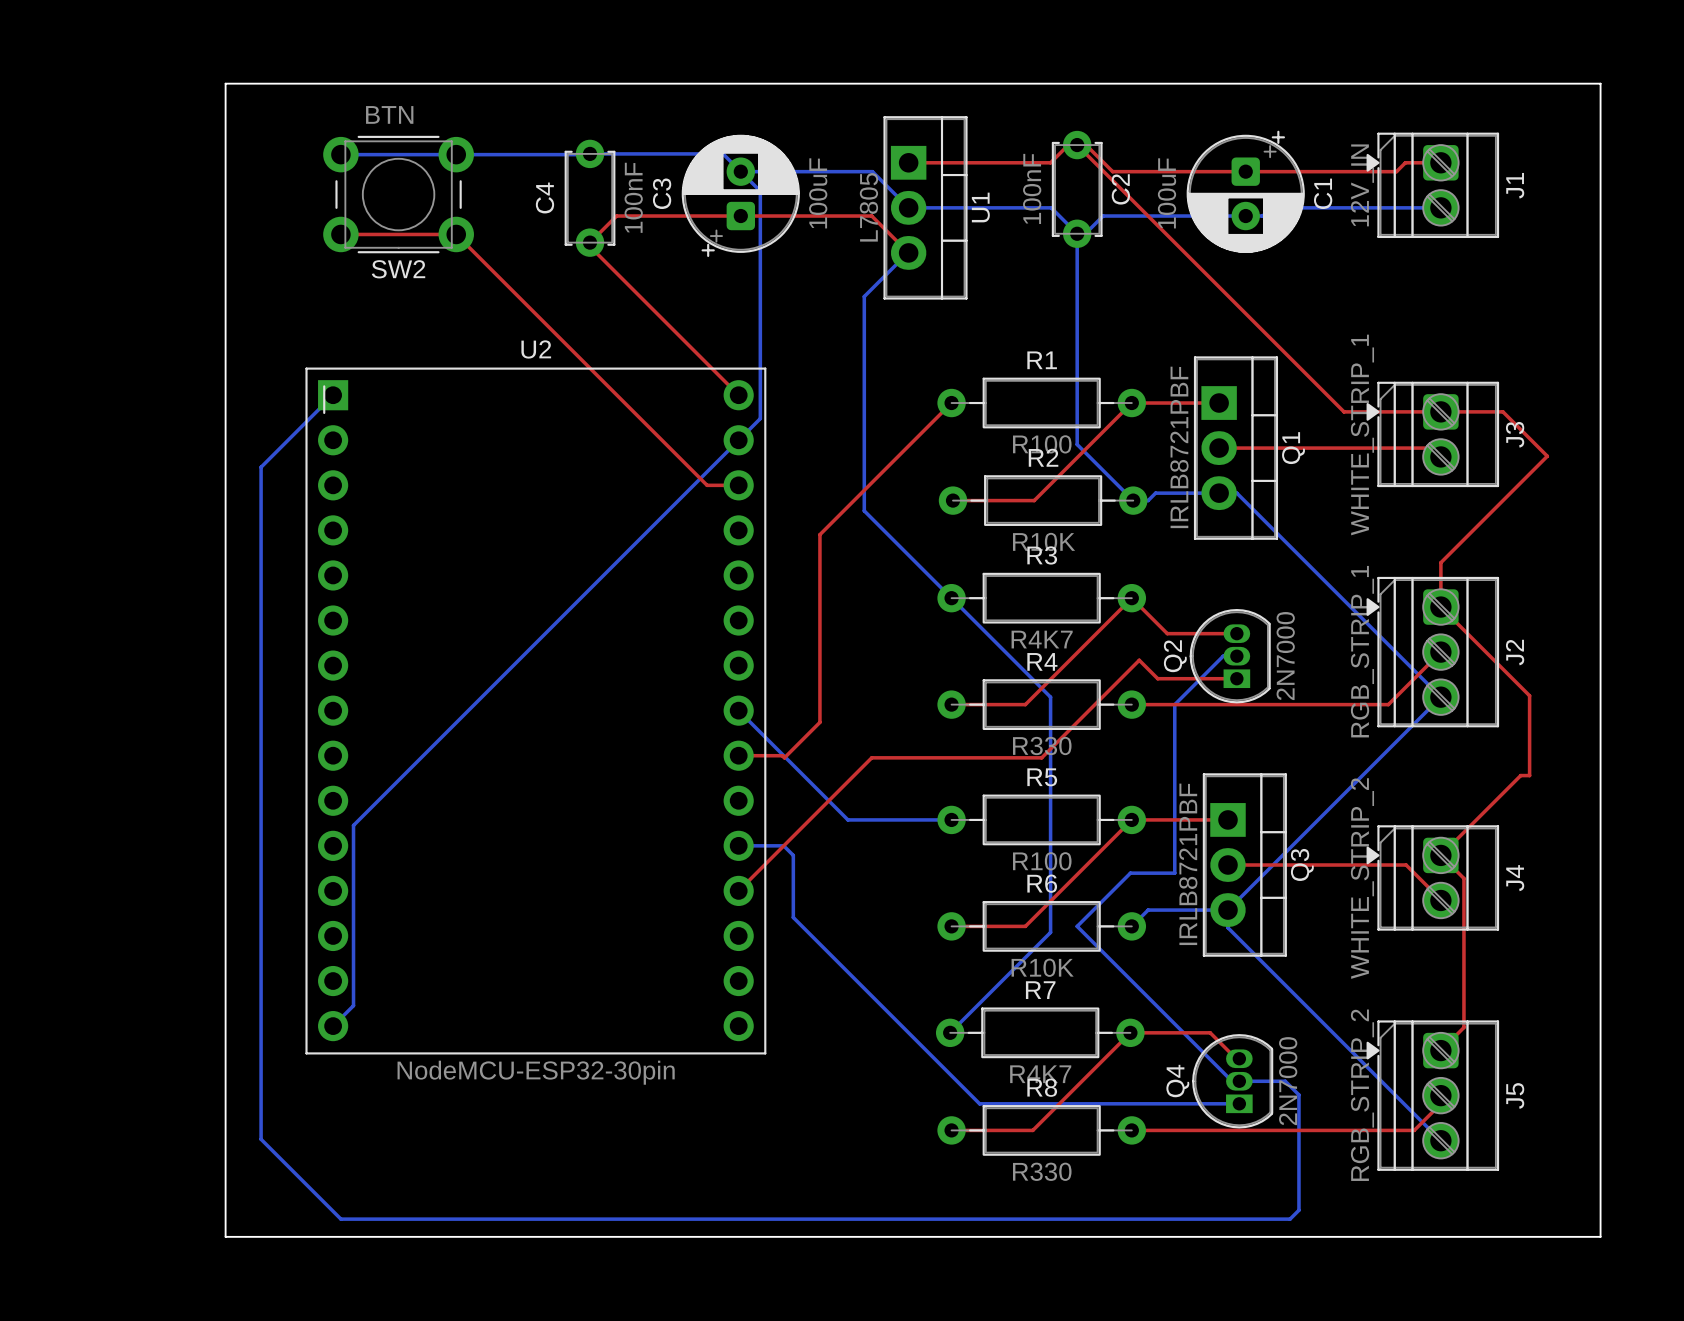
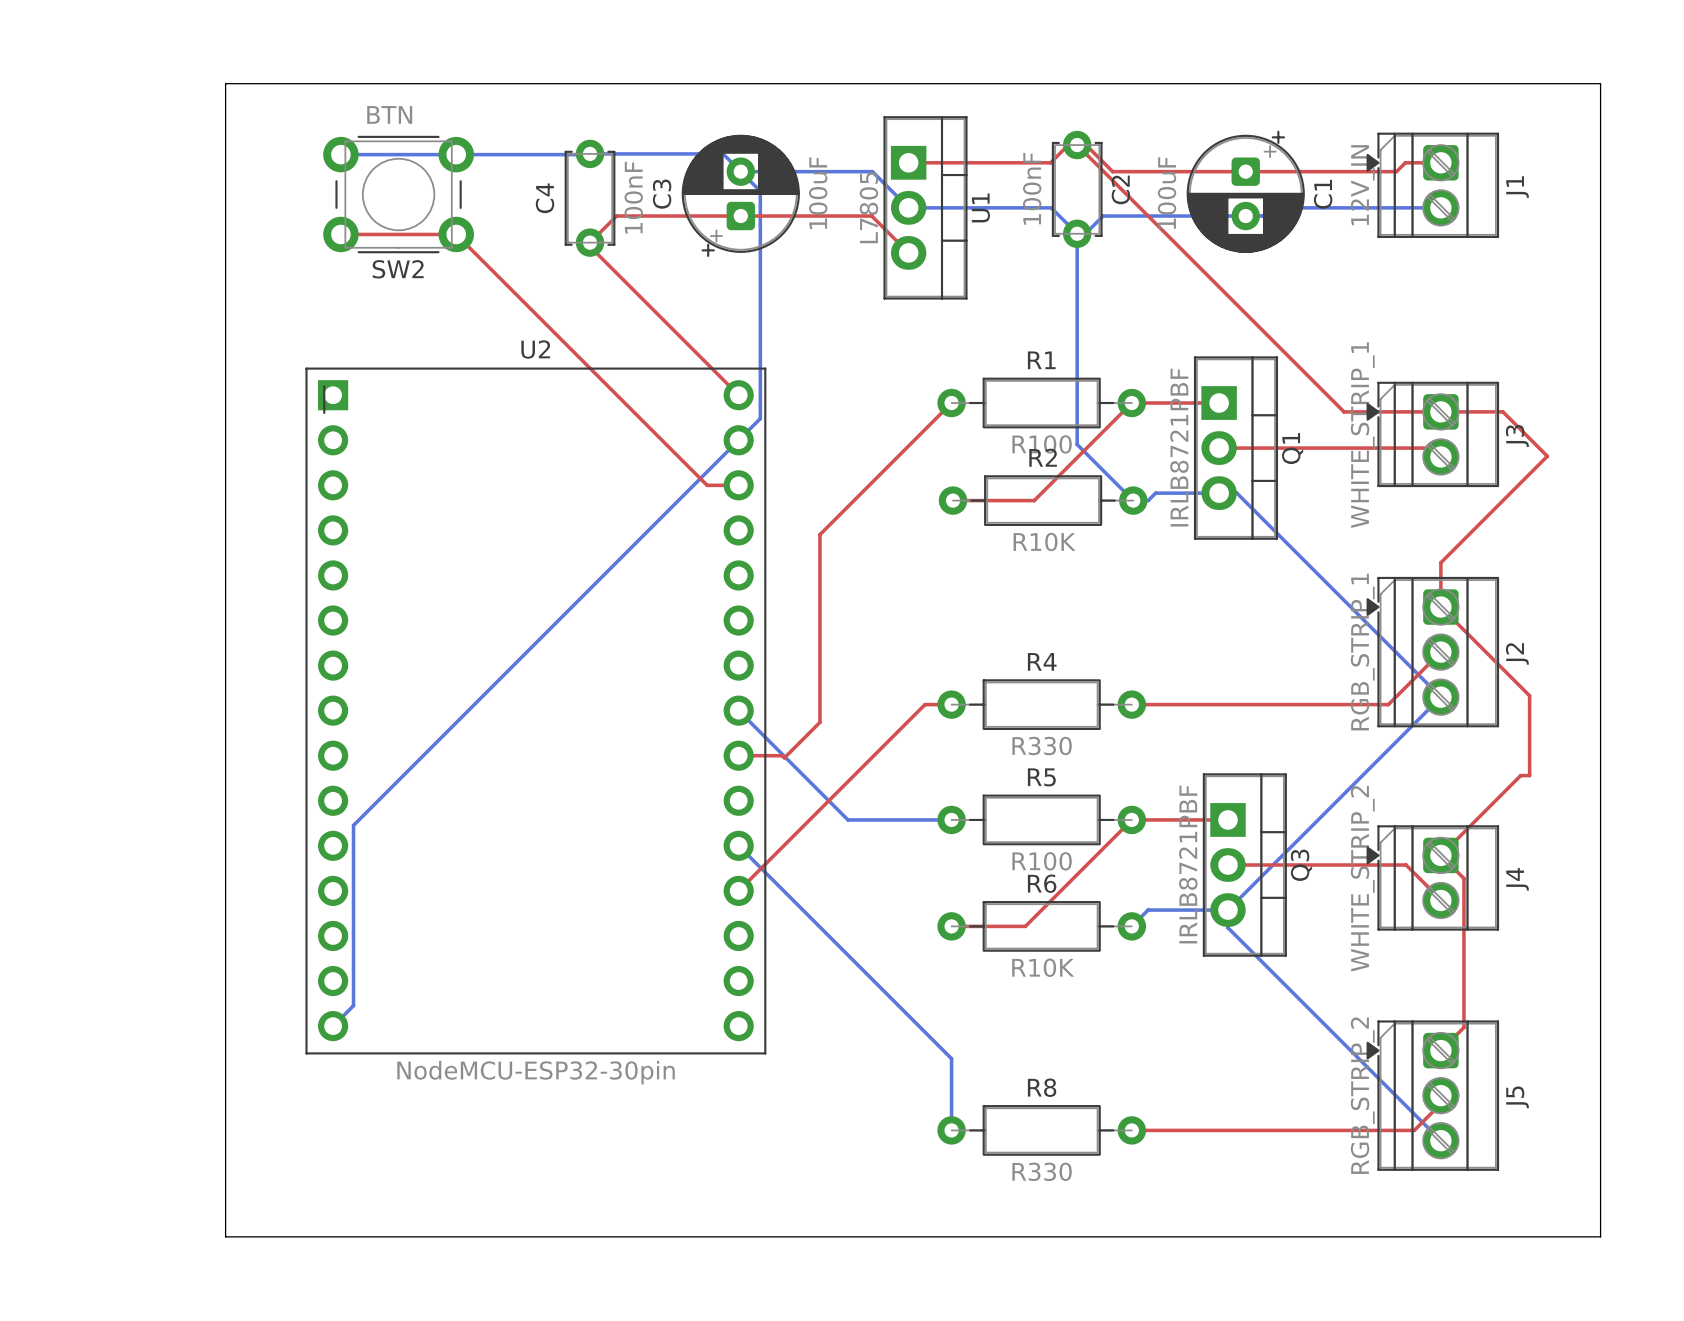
bottom track: (908, 252) (864, 296) (864, 510) (1050, 697) (1050, 932) (950, 1032) -> none
bottom track: (333, 395) (261, 467) (261, 1139) (340, 1219) (1290, 1219) (1298, 1210) (1298, 1094) (1285, 1081) (1228, 1081) -> none
R3: R4K7 (1041, 598) -> none
top track: (1236, 633) (1167, 633) (1131, 598) (1025, 704) (951, 704) -> none
Q2: 2N7000 (1230, 656) -> none
bottom track: (1236, 656) (1223, 656) (1174, 704) (1174, 873) (1130, 873) (1077, 926) (1232, 1081) -> none
top track: (1236, 678) (1157, 678) (1139, 660) (1041, 757) (871, 757) -> (951, 704) (924, 704) (871, 757)
bottom track: (738, 845) (783, 845) (793, 855) (793, 917) (979, 1103) (1239, 1103) -> (738, 845) (951, 1058) (951, 1130)
R7: R4K7 (1040, 1032) -> none
top track: (1239, 1058) (1236, 1059) (1210, 1032) (1130, 1032) (1032, 1130) (951, 1130) -> none
Q4: 2N7000 (1232, 1081) -> none

